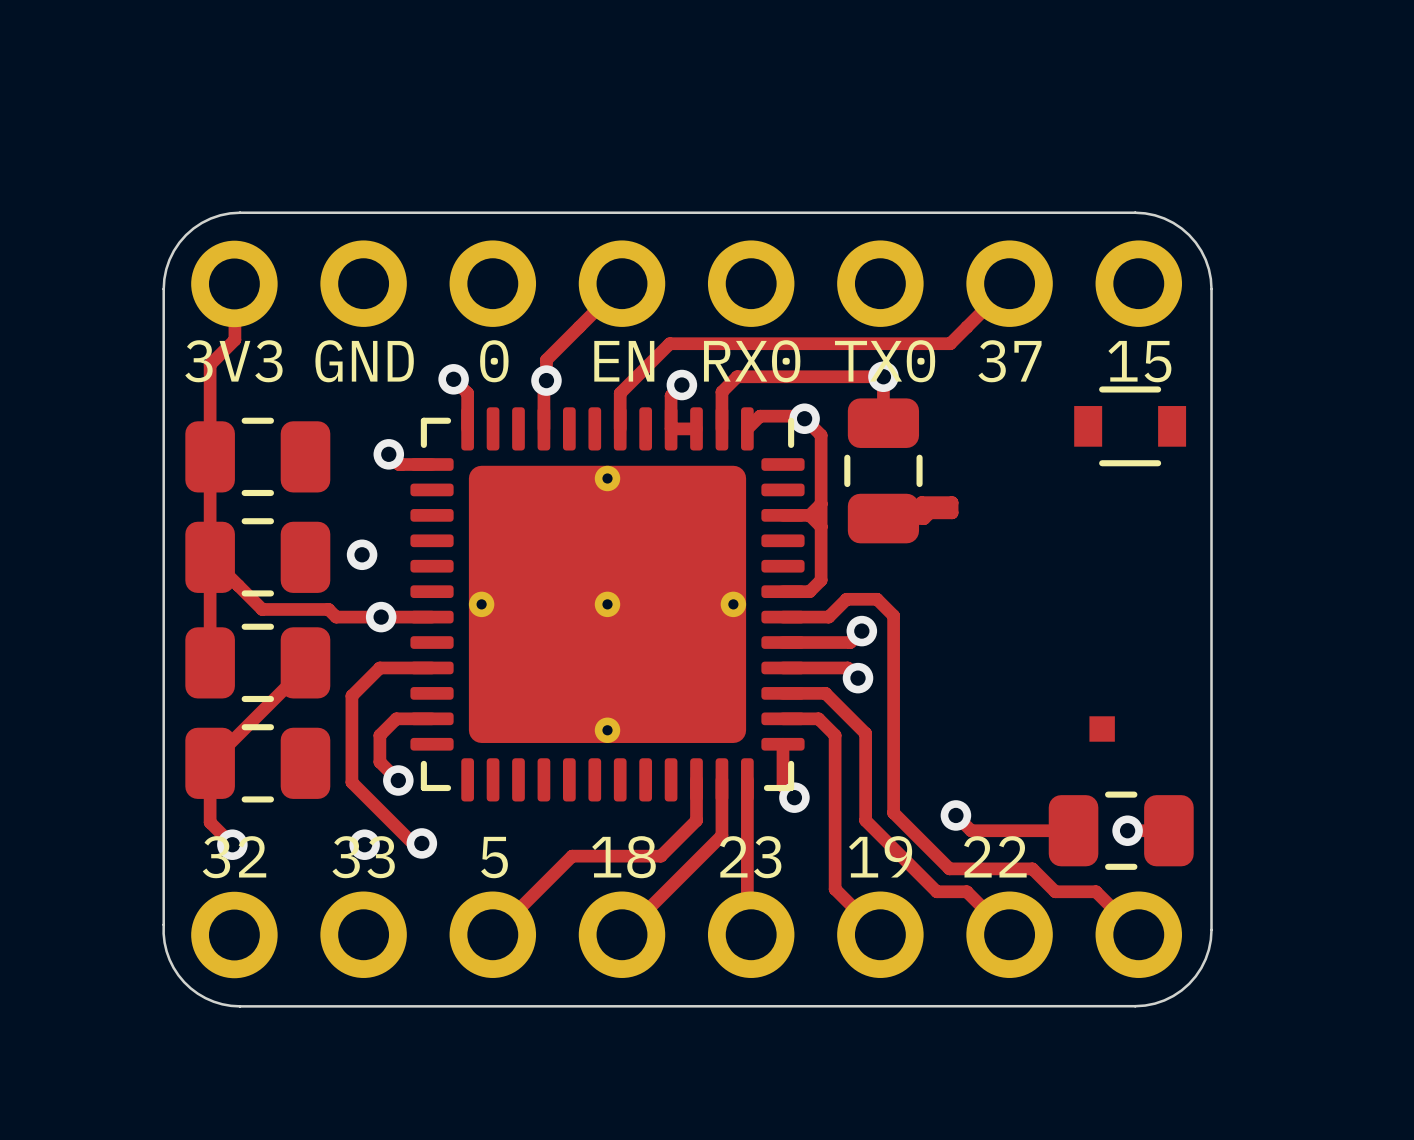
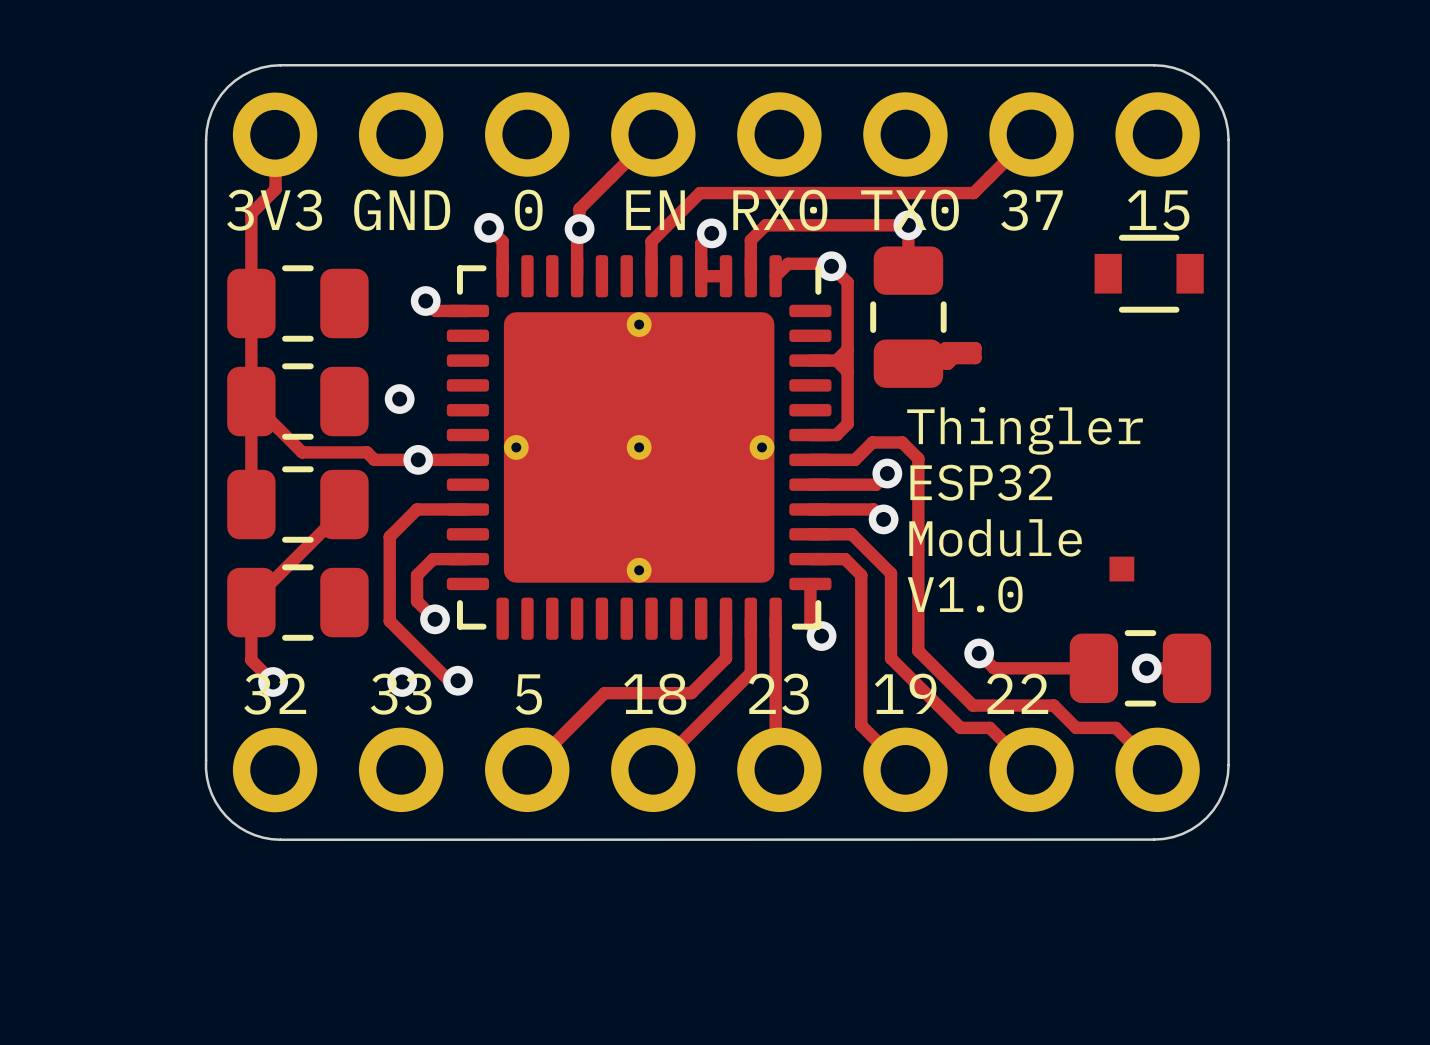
text: none -> Thingler (1025, 430)
text: none -> ESP32 (981, 482)
text: none -> Module (995, 537)
text: none -> V1.0 (965, 594)

